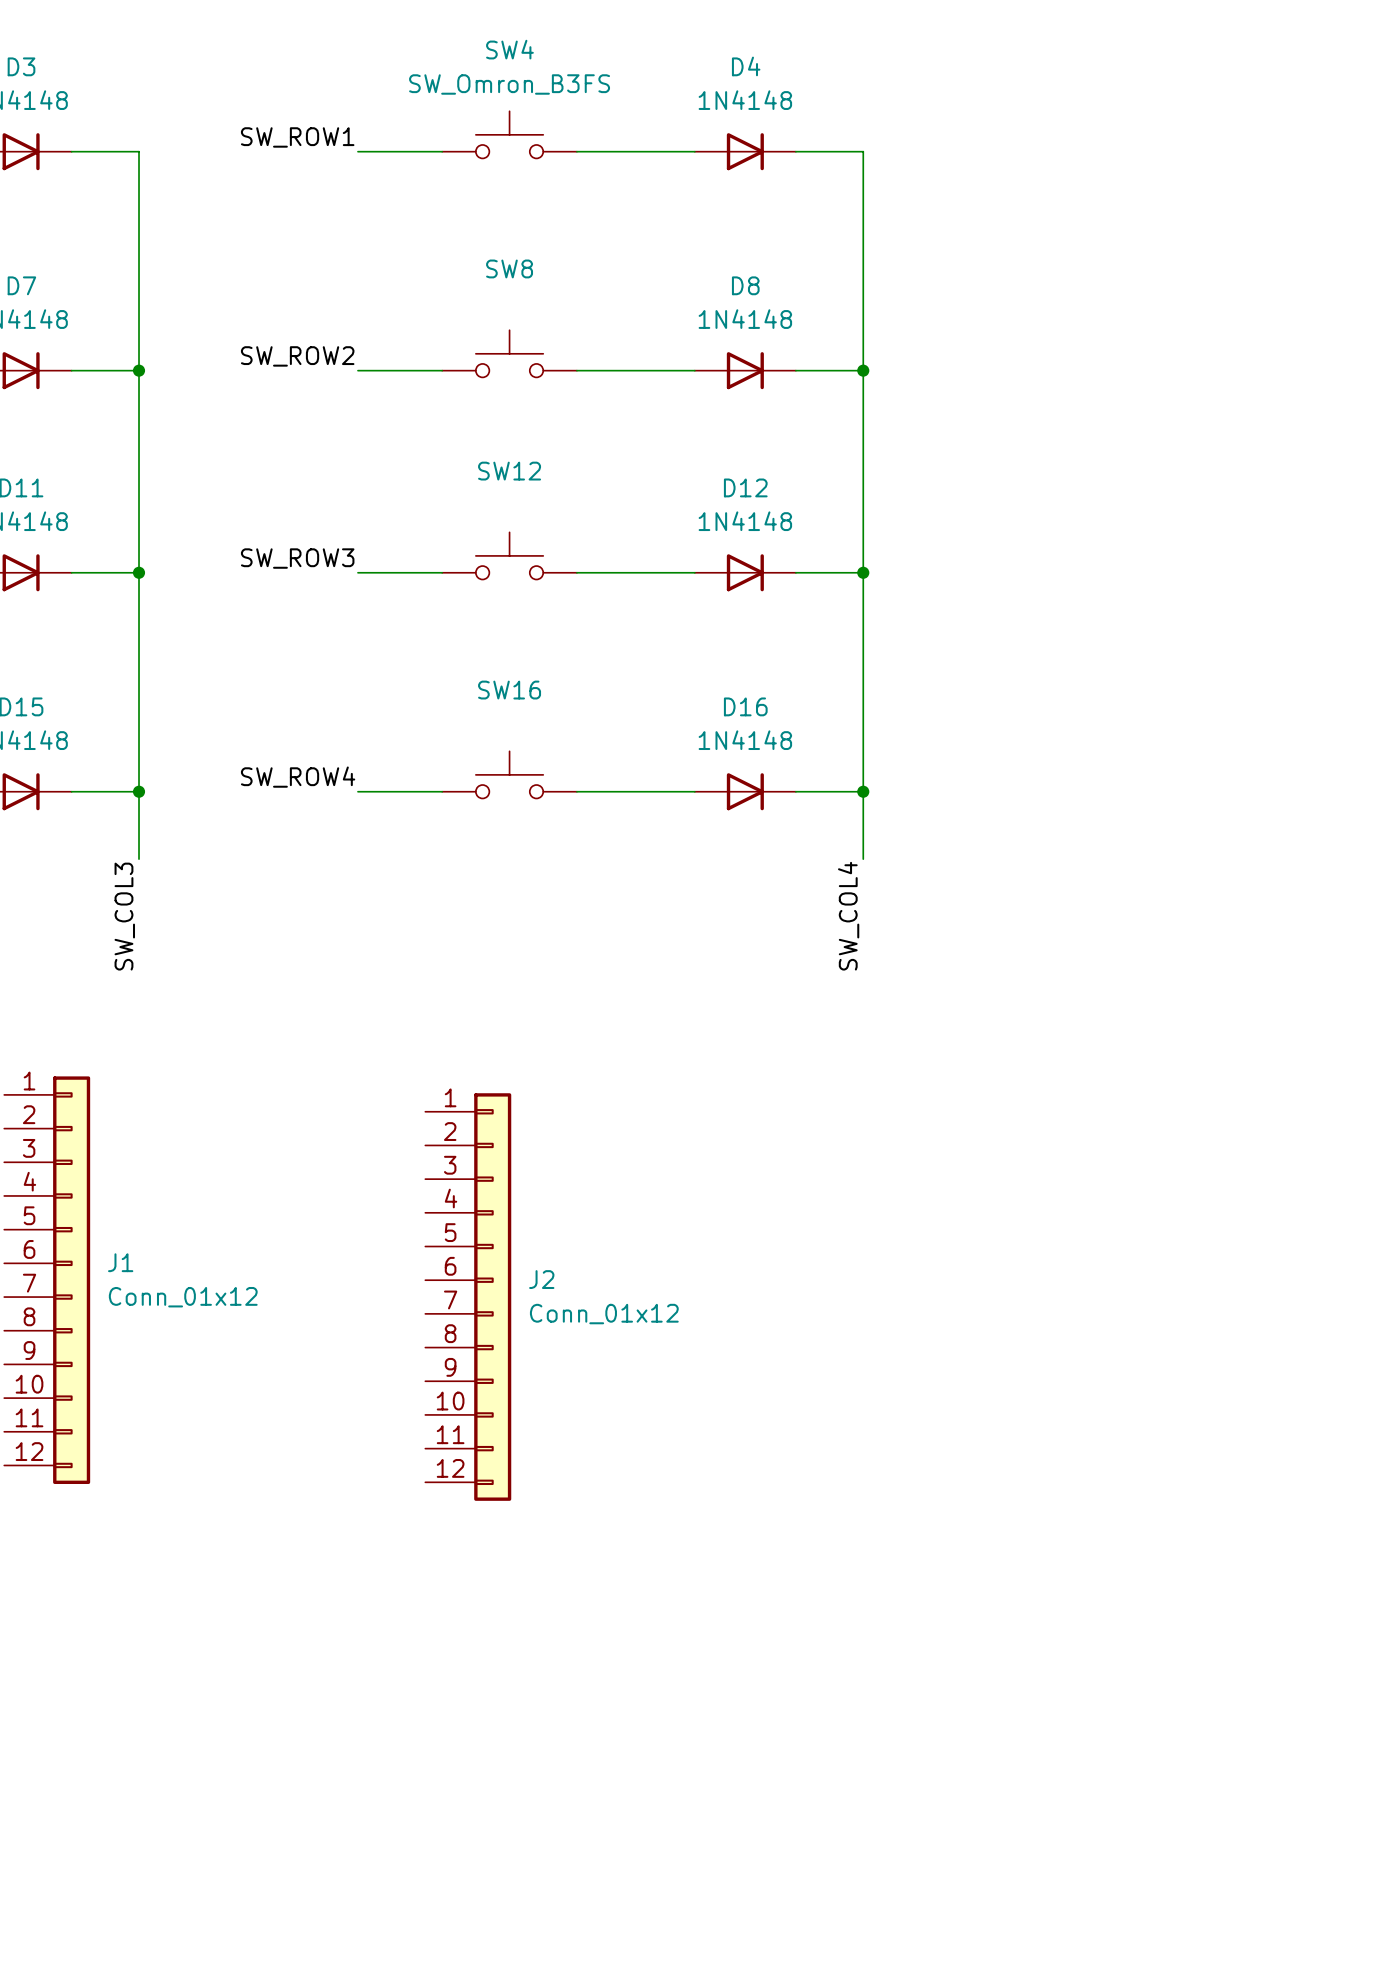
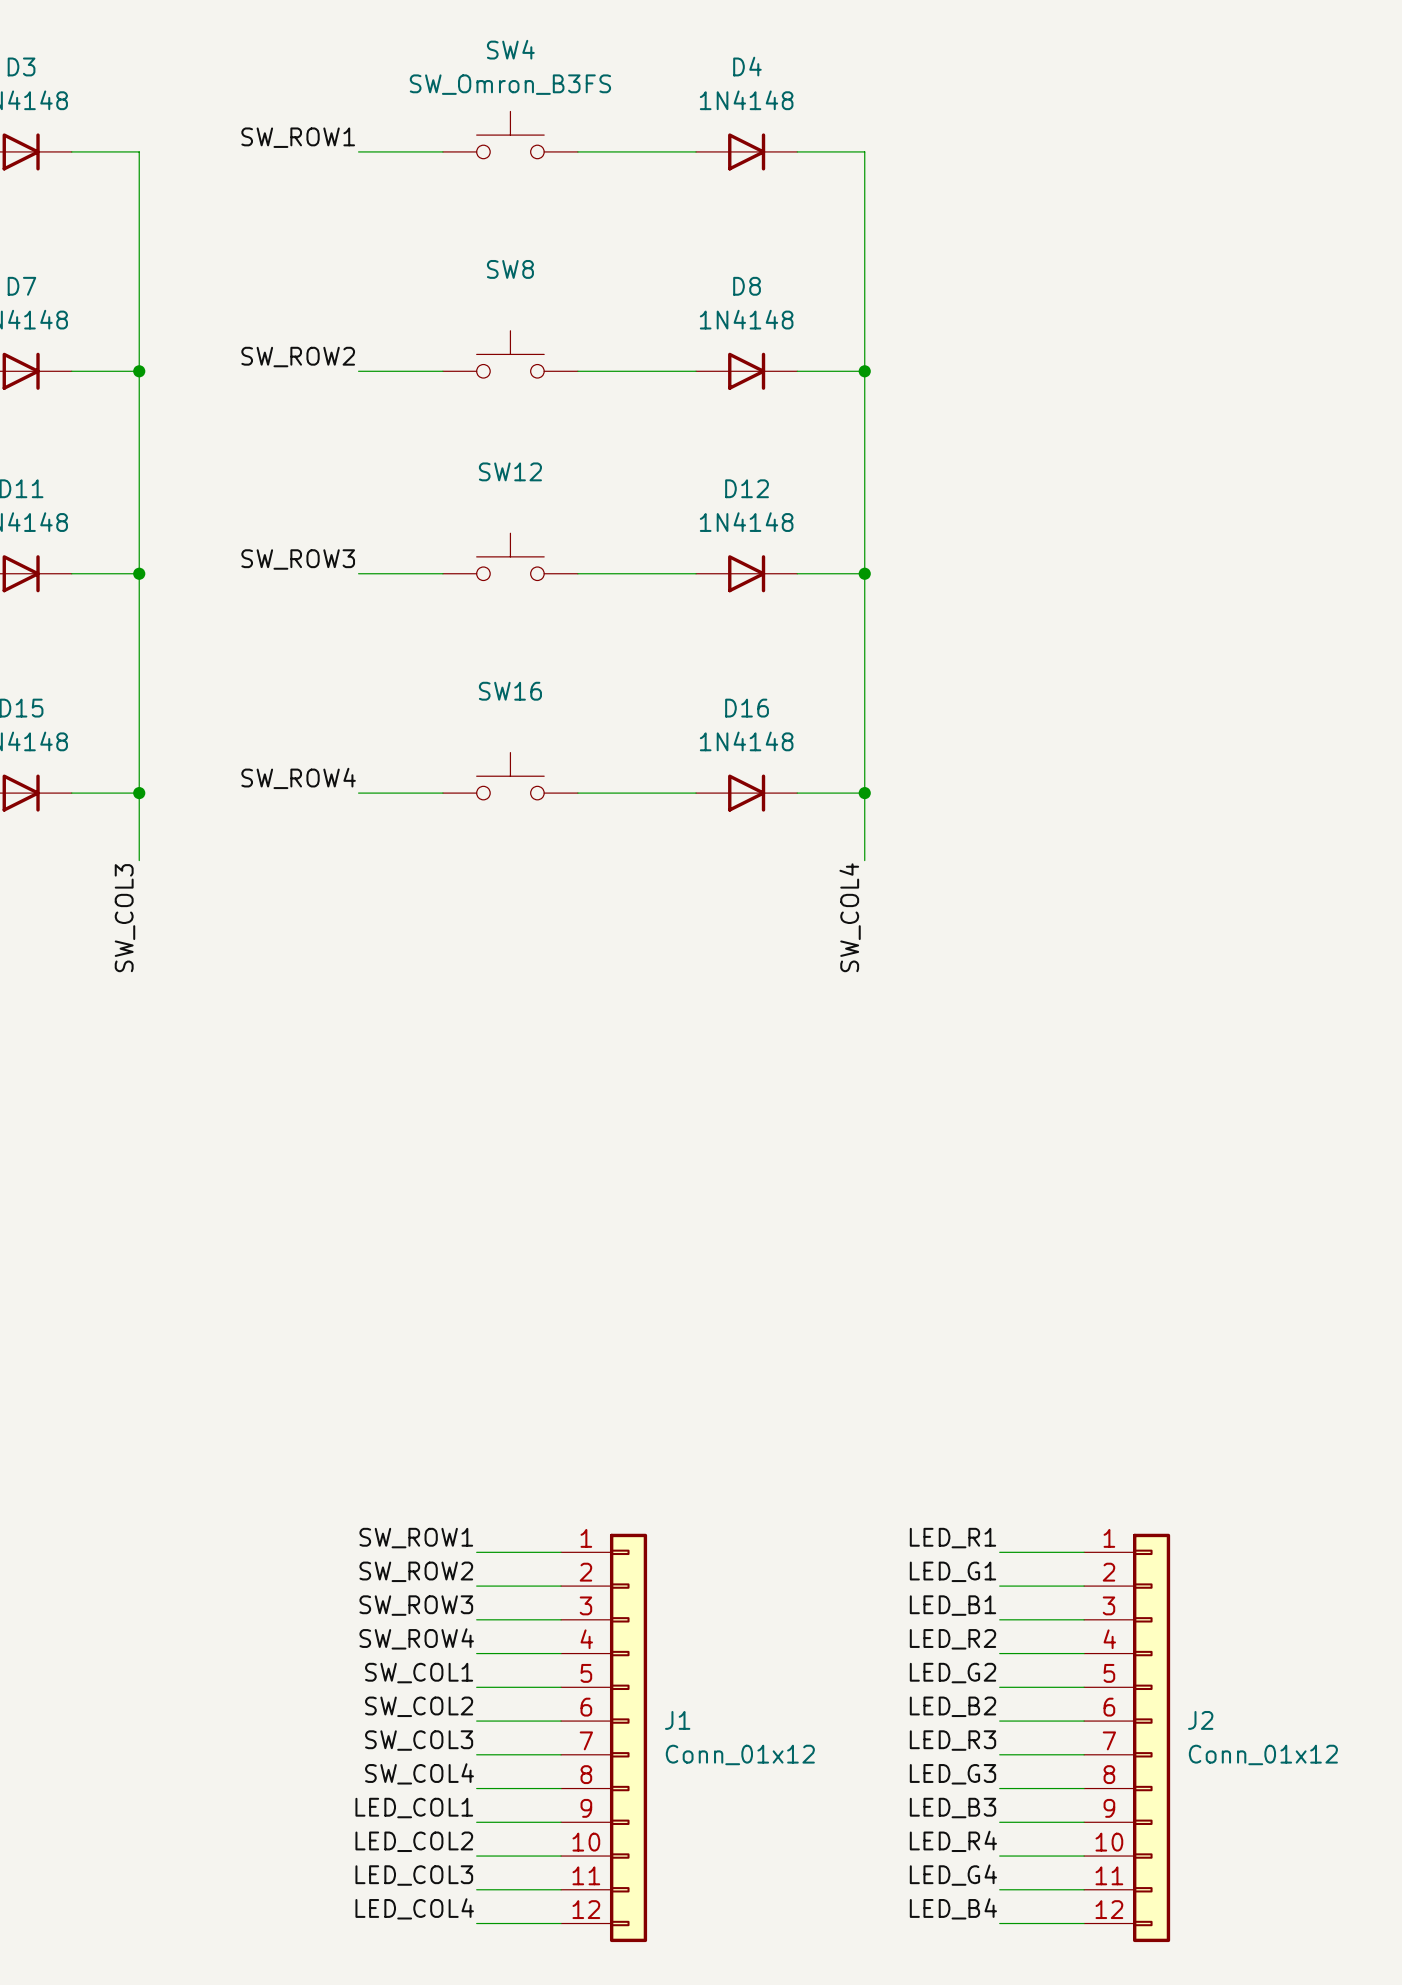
J1 position: (47, 1280) -> (604, 1737)
J2 position: (468, 1297) -> (1127, 1737)
label: none -> SW_ROW1 (416, 1538)
label: none -> LED_R1 (952, 1538)
wire: none -> (476, 1552) (561, 1552)
wire: none -> (999, 1552) (1084, 1552)
label: none -> SW_ROW2 (416, 1571)
label: none -> LED_G1 (952, 1571)
wire: none -> (476, 1586) (561, 1586)
wire: none -> (999, 1586) (1084, 1586)
label: none -> SW_ROW3 (416, 1605)
label: none -> LED_B1 (952, 1605)
wire: none -> (476, 1619) (561, 1619)
wire: none -> (999, 1619) (1084, 1619)
label: none -> SW_ROW4 (416, 1638)
label: none -> LED_R2 (952, 1639)
wire: none -> (476, 1653) (561, 1653)
wire: none -> (999, 1653) (1084, 1653)
label: none -> SW_COL1 (419, 1673)
label: none -> LED_G2 (952, 1673)
wire: none -> (476, 1687) (561, 1687)
wire: none -> (999, 1687) (1084, 1687)
label: none -> SW_COL2 (419, 1706)
label: none -> LED_B2 (952, 1706)
wire: none -> (476, 1721) (561, 1721)
wire: none -> (999, 1721) (1084, 1721)
label: none -> SW_COL3 (419, 1740)
label: none -> LED_R3 (952, 1740)
wire: none -> (476, 1754) (561, 1754)
wire: none -> (999, 1754) (1084, 1754)
label: none -> SW_COL4 (419, 1773)
label: none -> LED_G3 (952, 1774)
wire: none -> (476, 1788) (561, 1788)
wire: none -> (999, 1788) (1084, 1788)
label: none -> LED_COL1 (414, 1808)
label: none -> LED_B3 (952, 1808)
wire: none -> (476, 1822) (561, 1822)
wire: none -> (999, 1822) (1084, 1822)
label: none -> LED_COL2 (414, 1841)
label: none -> LED_R4 (953, 1841)
wire: none -> (476, 1856) (561, 1856)
wire: none -> (999, 1856) (1084, 1856)
label: none -> LED_G4 (953, 1875)
label: none -> LED_COL3 (414, 1875)
wire: none -> (476, 1889) (561, 1889)
wire: none -> (999, 1889) (1084, 1889)
label: none -> LED_COL4 (414, 1908)
label: none -> LED_B4 (953, 1908)
wire: none -> (476, 1923) (561, 1923)
wire: none -> (999, 1923) (1084, 1923)

